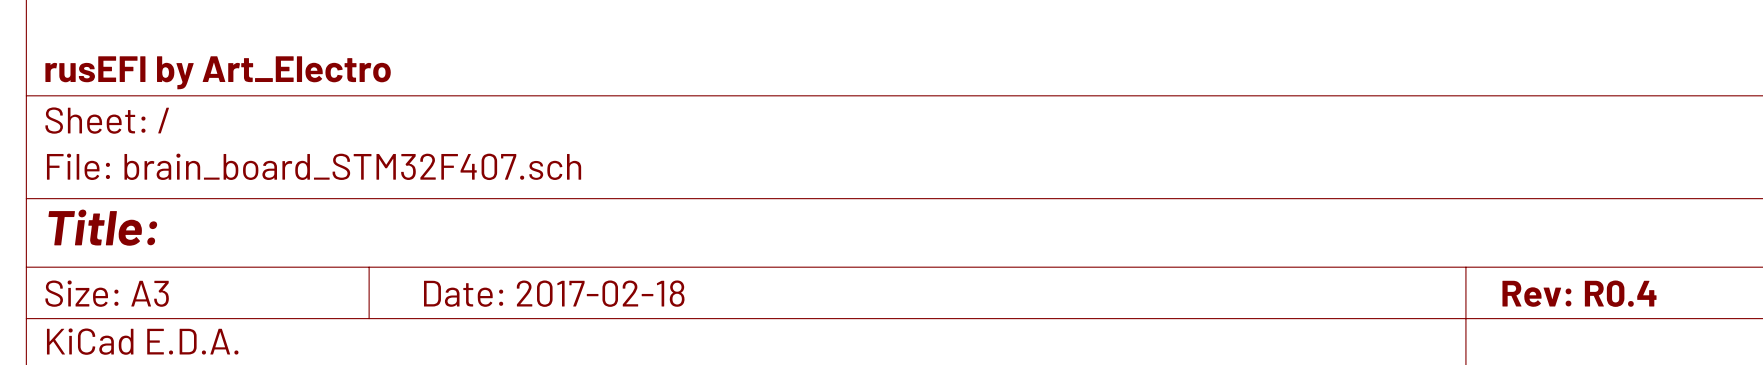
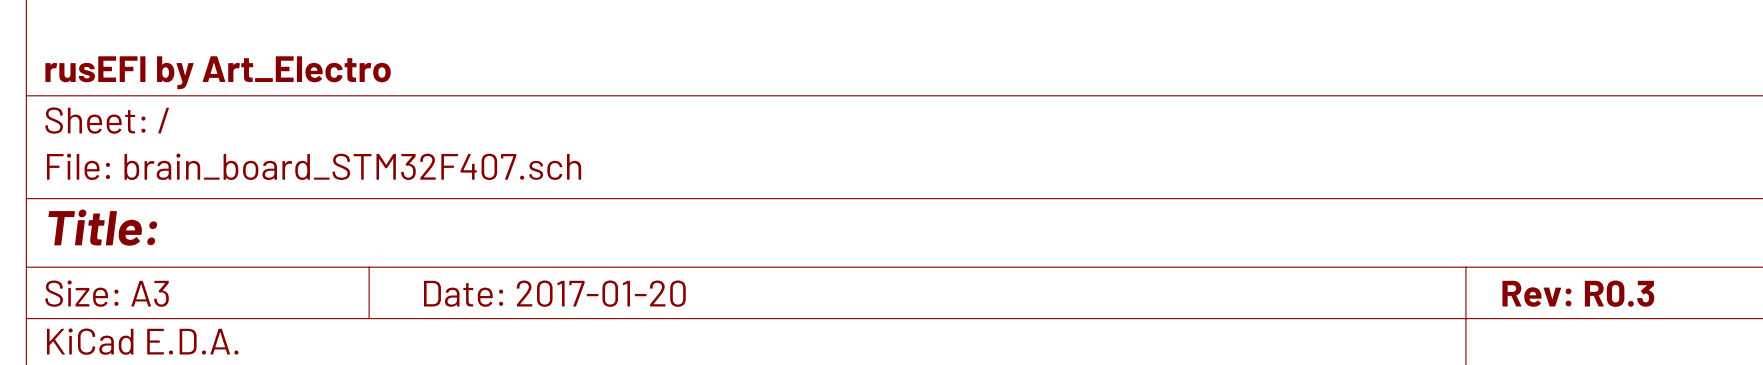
title block: Date: 2017-02-18 (554, 293) -> Date: 2017-01-20 (554, 293)
title block: Rev: R0.4 (1579, 293) -> Rev: R0.3 (1578, 293)

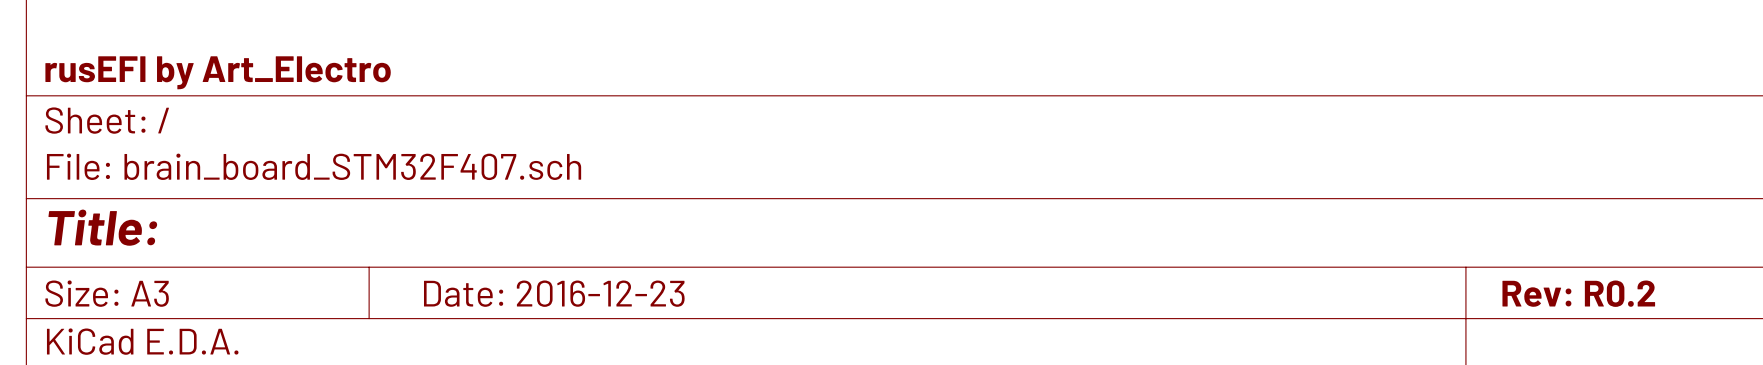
title block: Date: 2017-01-20 (554, 293) -> Date: 2016-12-23 (554, 293)
title block: Rev: R0.3 (1578, 293) -> Rev: R0.2 (1578, 293)

